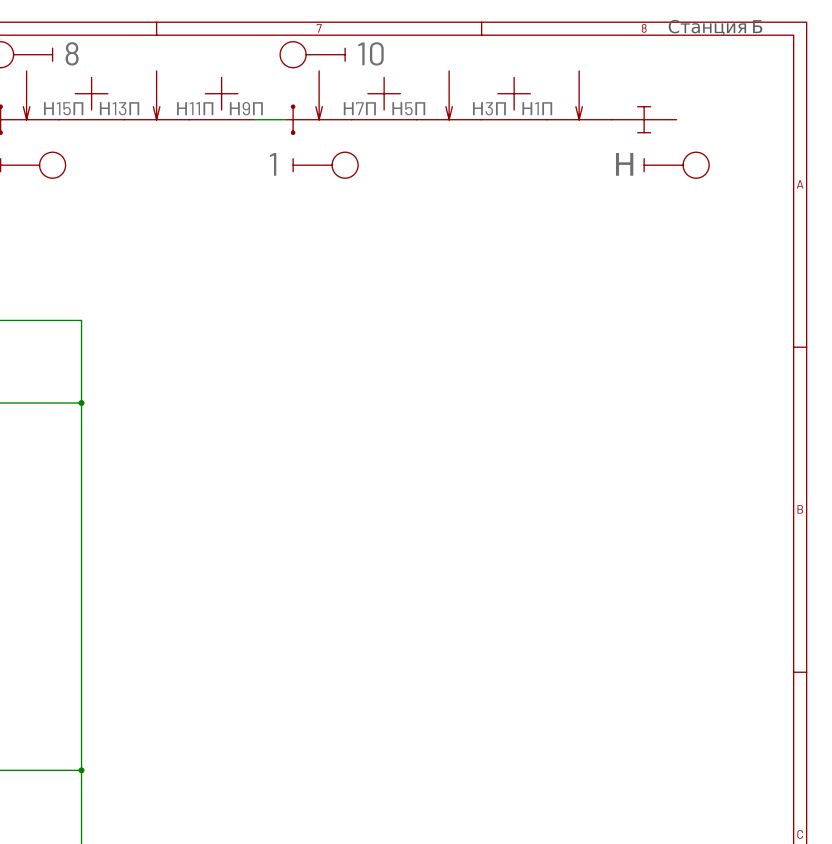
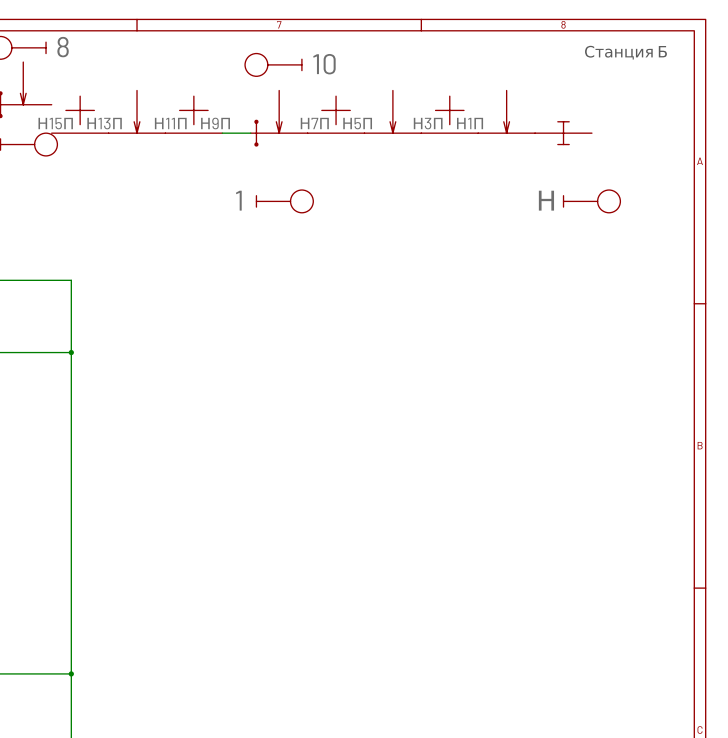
text position: Станция Б (715, 27) -> Станция Б (625, 52)
part position: (312, 54) -> (273, 64)
part position: (156, 95) -> (137, 111)
part position: (319, 95) -> (279, 111)
part position: (449, 95) -> (392, 111)
part position: (579, 95) -> (506, 111)
part position: (91, 98) -> (80, 114)
part position: (221, 98) -> (193, 114)
part position: (384, 98) -> (336, 114)
part position: (514, 98) -> (449, 114)
label position: Н15П (63, 108) -> Н15П (55, 123)
label position: Н13П (119, 108) -> Н13П (104, 123)
label position: Н11П (195, 108) -> Н11П (170, 123)
label position: Н9П (246, 108) -> Н9П (215, 123)
label position: Н7П (359, 108) -> Н7П (314, 123)
label position: Н5П (408, 108) -> Н5П (357, 123)
label position: Н3П (489, 108) -> Н3П (428, 123)
label position: Н1П (537, 108) -> Н1П (470, 123)
wire: (254, 119) (286, 119) -> (222, 133) (250, 133)
part position: (293, 119) -> (256, 133)
part position: (644, 119) -> (563, 133)
part position: (325, 165) -> (284, 201)
part position: (676, 165) -> (591, 201)

